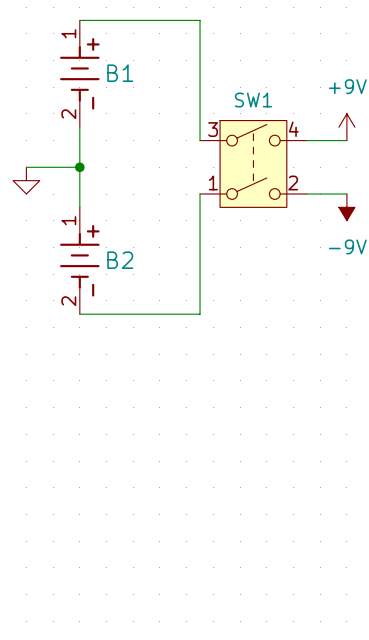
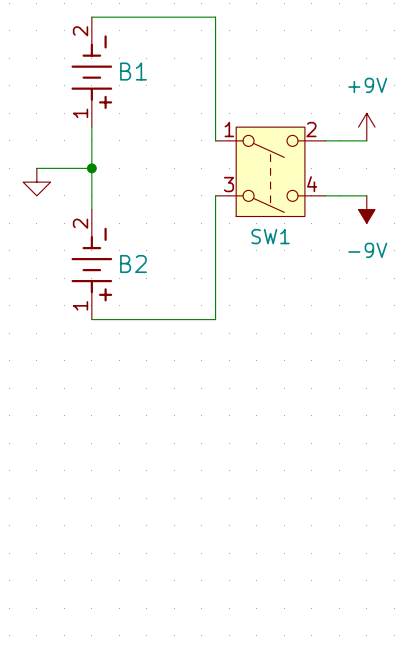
B1 flip: as is (79, 73) -> up-down (91, 72)
SW1 flip: as is (253, 163) -> up-down (270, 171)
B2 flip: as is (79, 260) -> up-down (91, 264)

